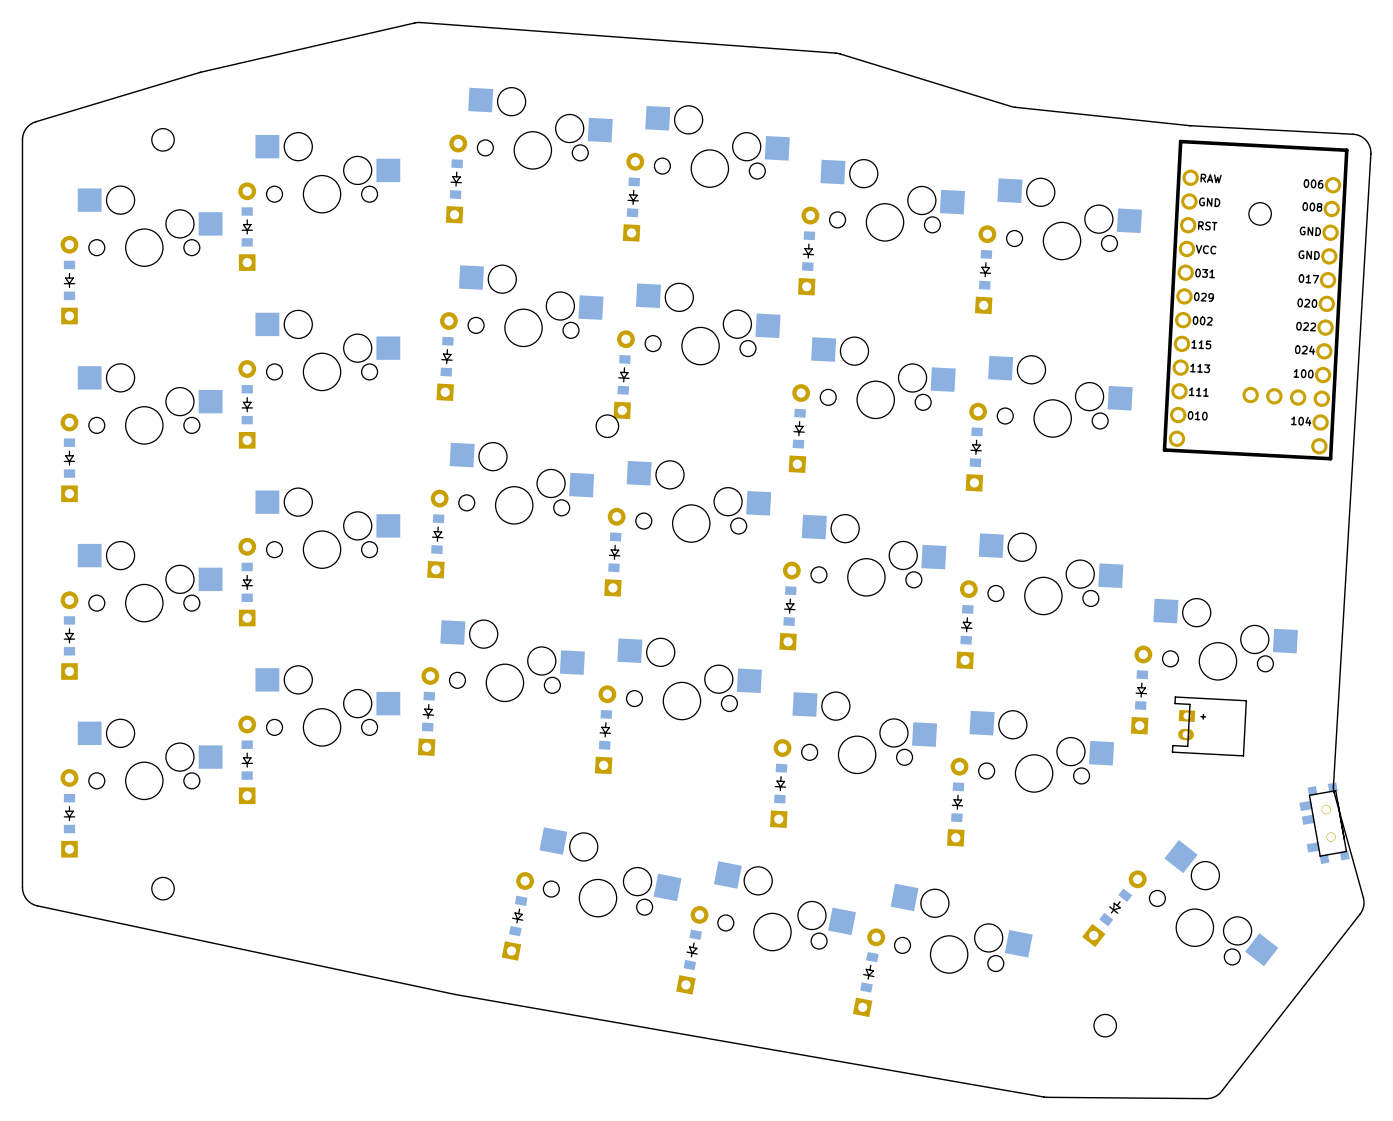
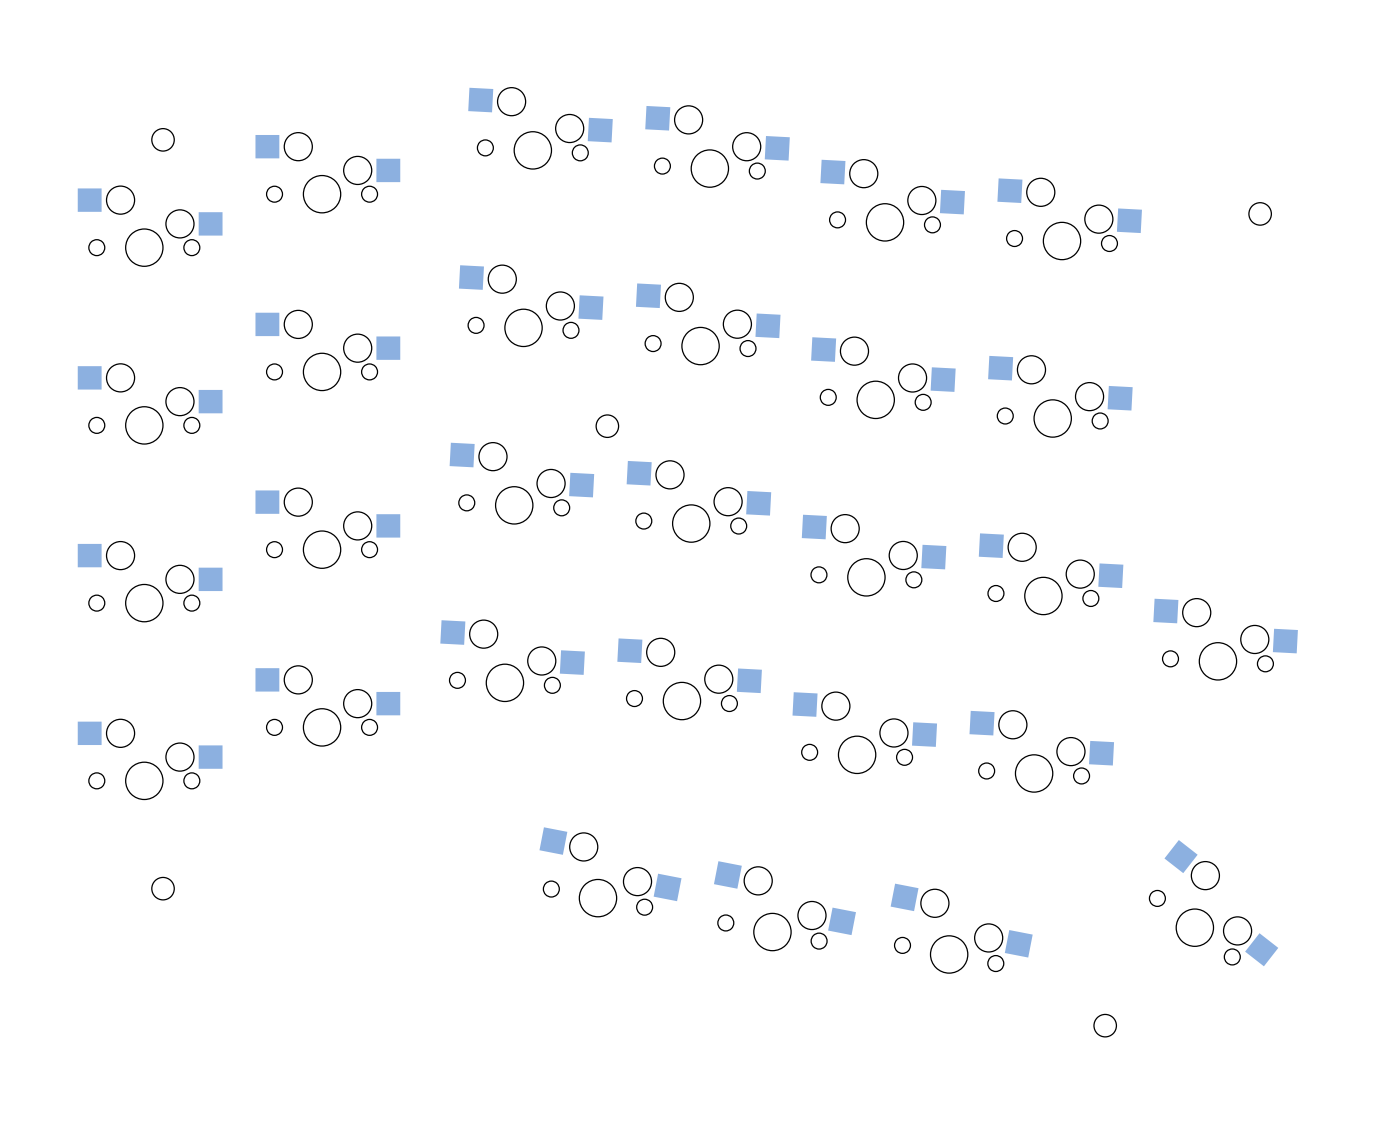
board edge: (420, 22) (835, 53) (1013, 106) (1190, 125) (1353, 134) (1361, 136) (1367, 142) (1370, 154) (1333, 787) (1363, 897) (1363, 906) (1360, 914) (1218, 1094) (1206, 1098) (1043, 1097) (455, 994) (37, 905) (26, 899) (22, 887) (23, 132) (29, 125) (35, 121) (200, 72) (420, 22) -> none
part: (456, 179) -> none
part: (633, 197) -> none
part: (247, 226) -> none
part: (808, 251) -> none
part: (985, 269) -> none
part: (69, 280) -> none
part: (1255, 300) -> none
part: (447, 356) -> none
part: (624, 374) -> none
part: (247, 404) -> none
part: (799, 428) -> none
part: (976, 447) -> none
part: (69, 457) -> none
part: (437, 534) -> none
part: (614, 552) -> none
part: (247, 582) -> none
part: (790, 606) -> none
part: (967, 624) -> none
part: (69, 635) -> none
part: (1141, 690) -> none
part: (428, 711) -> none
part: (1209, 726) -> none
part: (605, 729) -> none
part: (247, 759) -> none
part: (780, 783) -> none
part: (957, 802) -> none
part: (69, 813) -> none
part: (1324, 823) -> none
part: (1114, 908) -> none
part: (517, 916) -> none
part: (692, 950) -> none
part: (869, 972) -> none

